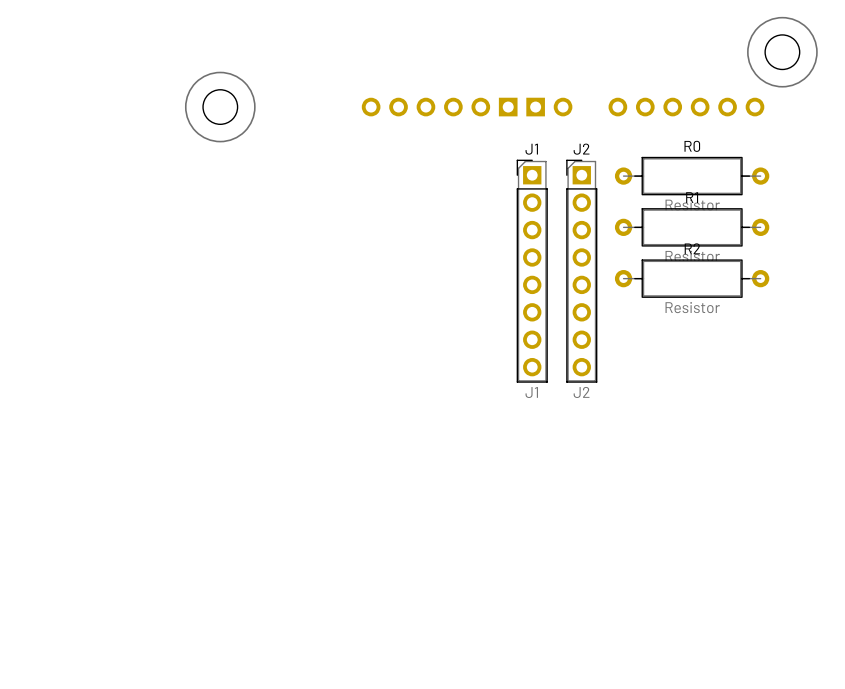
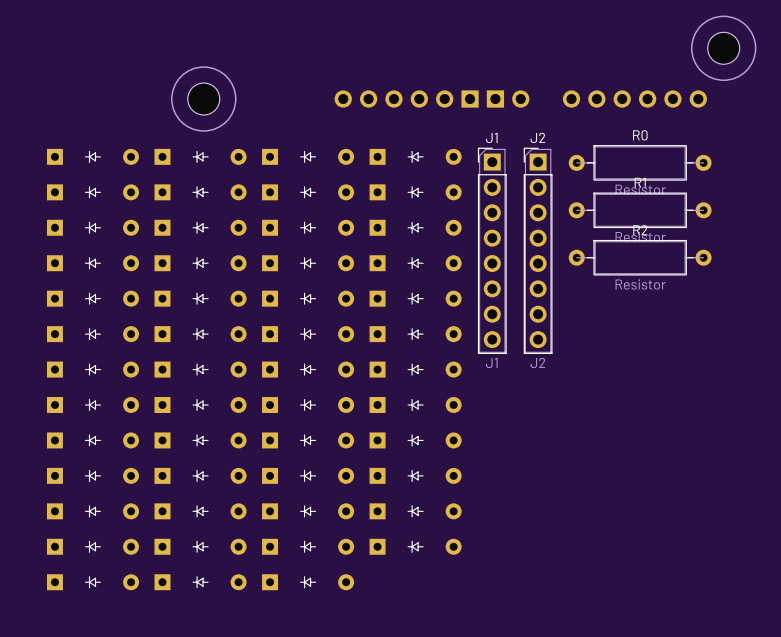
part: none -> (93, 156)
part: none -> (200, 156)
part: none -> (308, 156)
part: none -> (415, 156)
part: none -> (93, 192)
part: none -> (200, 192)
part: none -> (308, 192)
part: none -> (415, 192)
part: none -> (93, 227)
part: none -> (200, 227)
part: none -> (308, 227)
part: none -> (415, 227)
part: none -> (93, 263)
part: none -> (200, 263)
part: none -> (308, 263)
part: none -> (415, 263)
part: none -> (93, 298)
part: none -> (200, 298)
part: none -> (308, 298)
part: none -> (415, 298)
part: none -> (93, 334)
part: none -> (200, 334)
part: none -> (308, 334)
part: none -> (415, 334)
part: none -> (93, 369)
part: none -> (200, 369)
part: none -> (308, 369)
part: none -> (415, 369)
part: none -> (93, 405)
part: none -> (200, 405)
part: none -> (308, 405)
part: none -> (415, 405)
part: none -> (93, 440)
part: none -> (200, 440)
part: none -> (308, 440)
part: none -> (415, 440)
part: none -> (93, 475)
part: none -> (200, 475)
part: none -> (308, 475)
part: none -> (415, 475)
part: none -> (93, 511)
part: none -> (200, 511)
part: none -> (308, 511)
part: none -> (415, 511)
part: none -> (93, 546)
part: none -> (200, 546)
part: none -> (308, 546)
part: none -> (415, 546)
part: none -> (93, 582)
part: none -> (200, 582)
part: none -> (308, 582)

